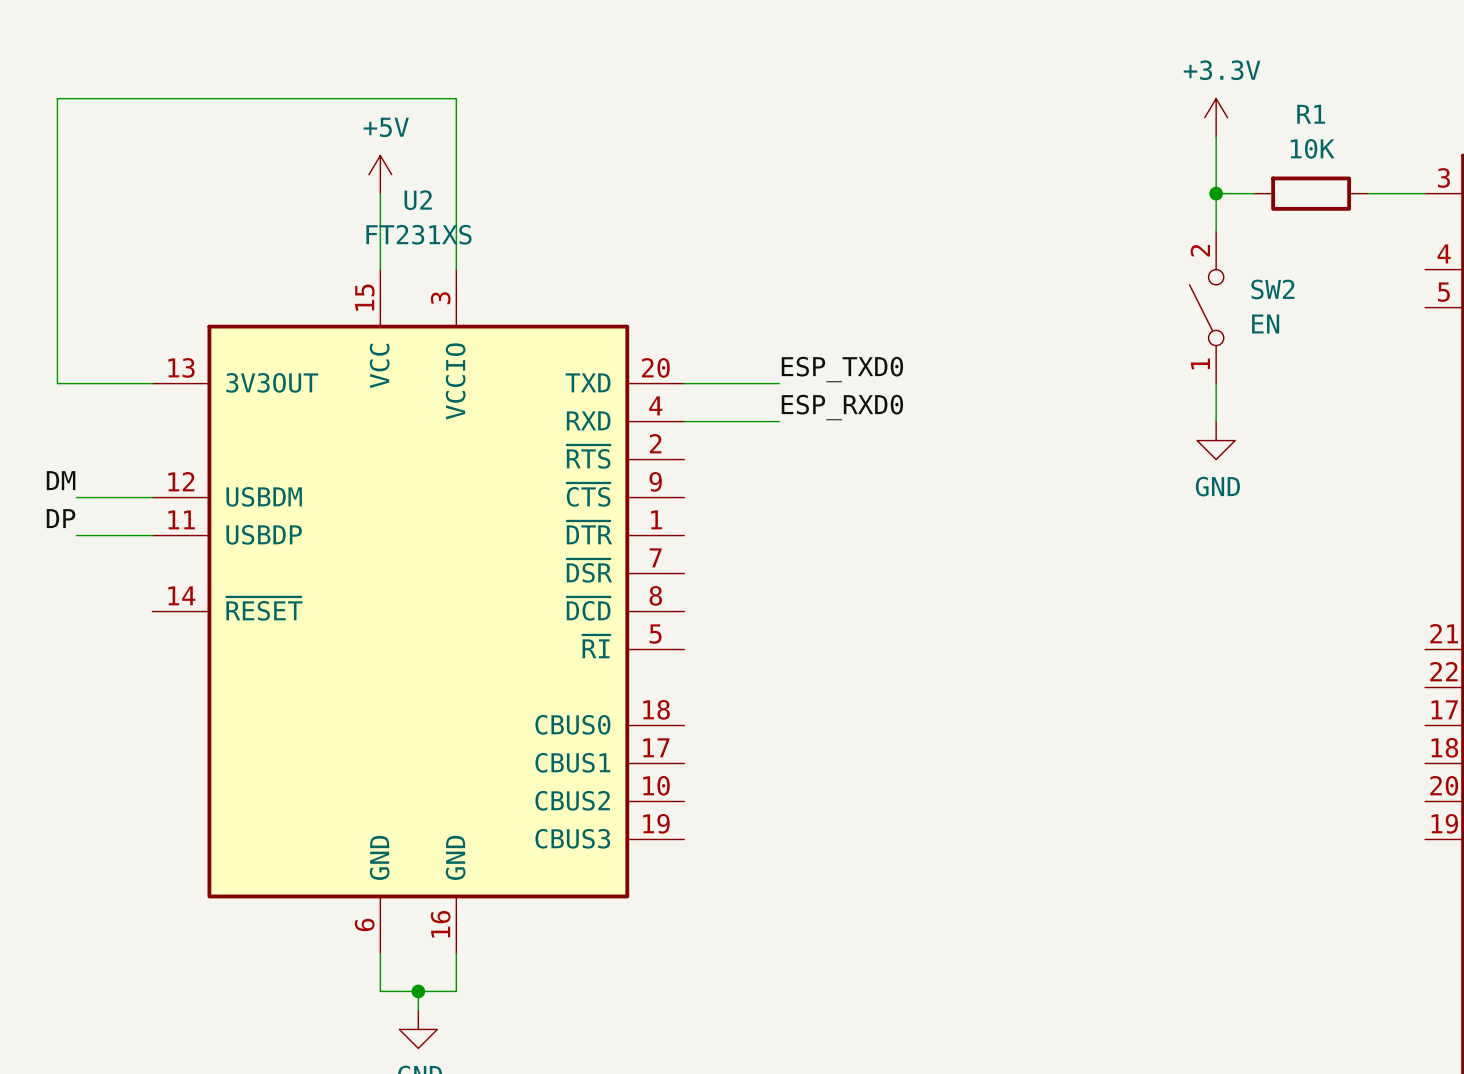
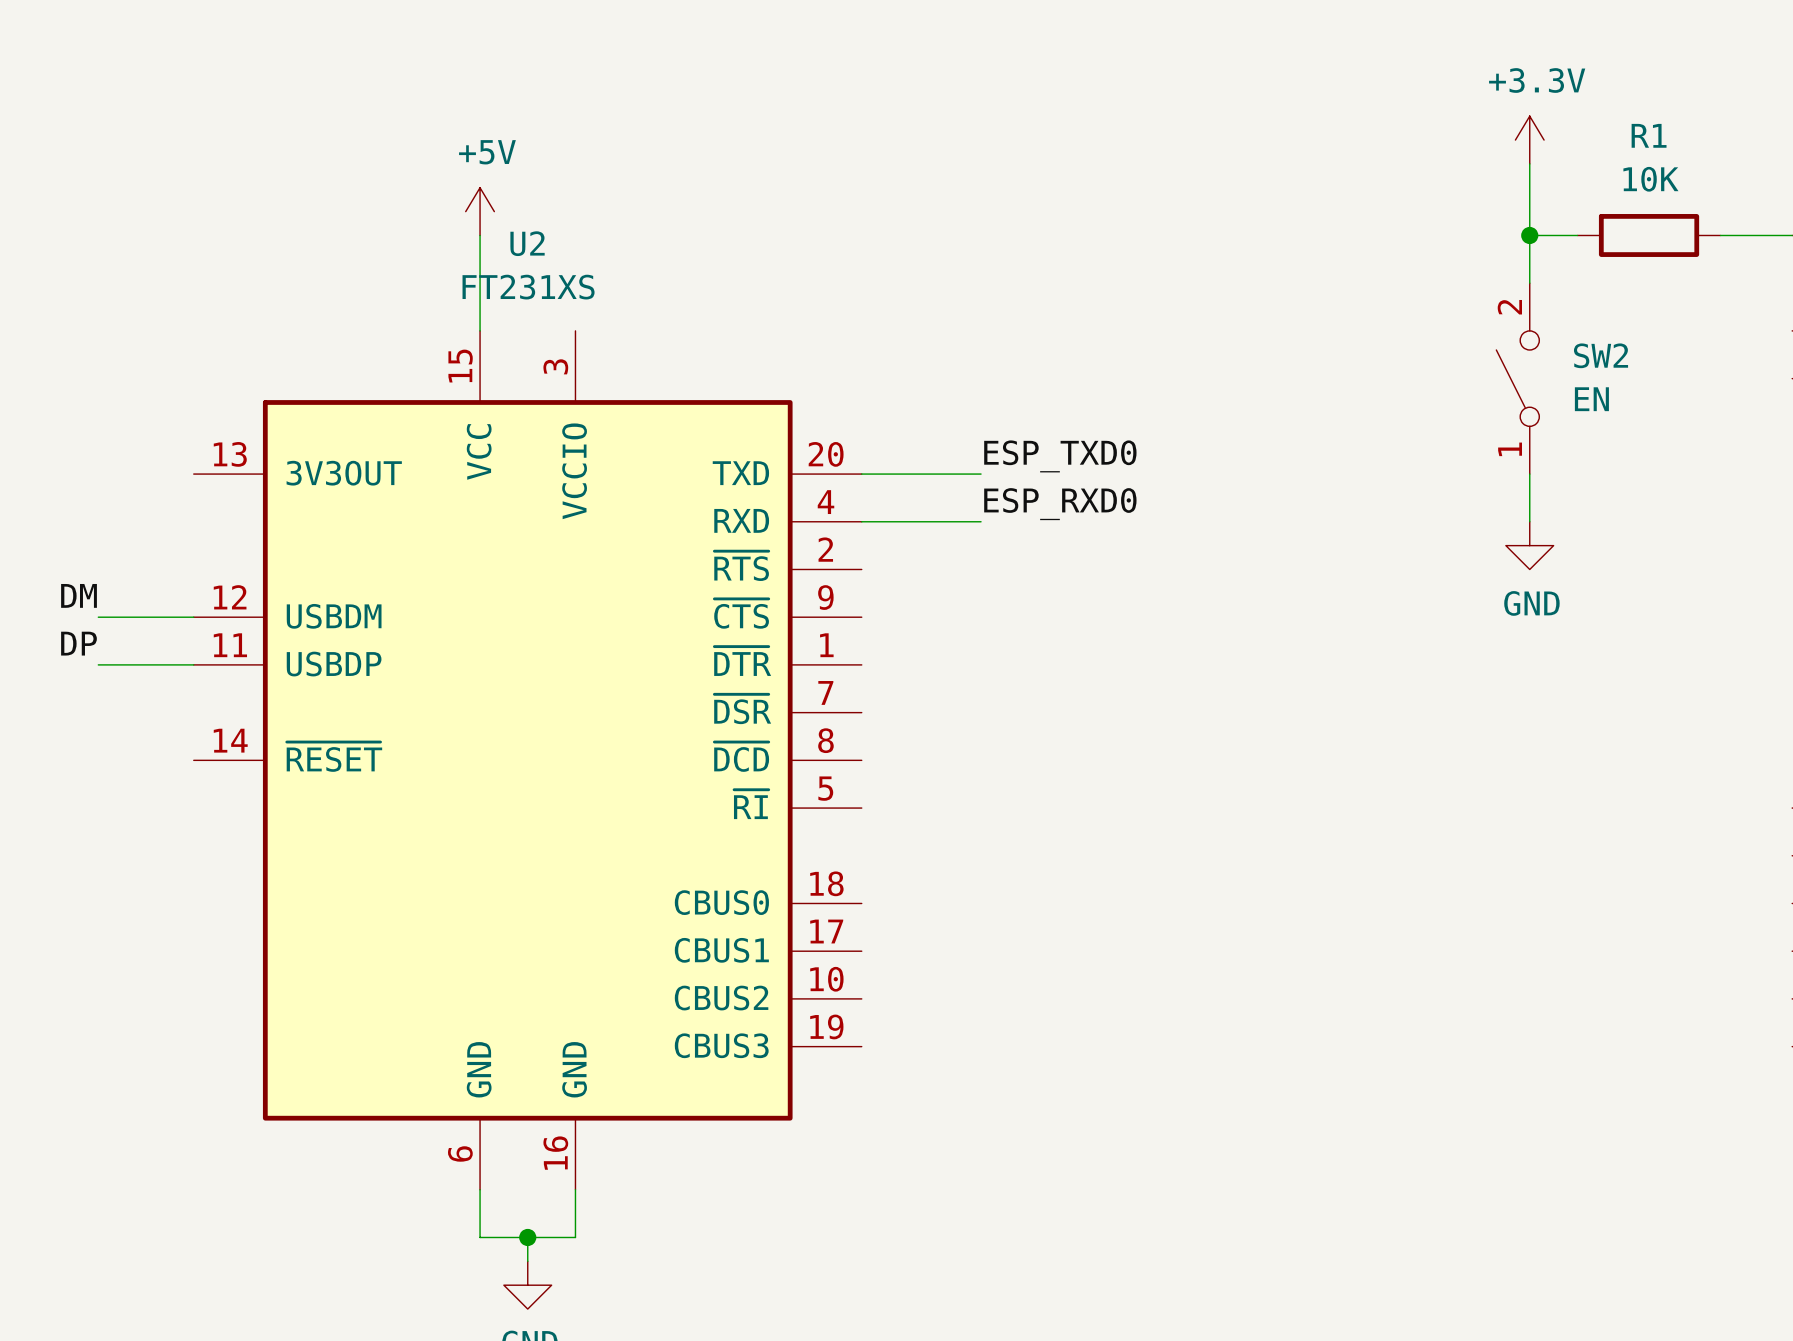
wire: (456, 269) (456, 98) (57, 98) (57, 383) (152, 383) -> none

